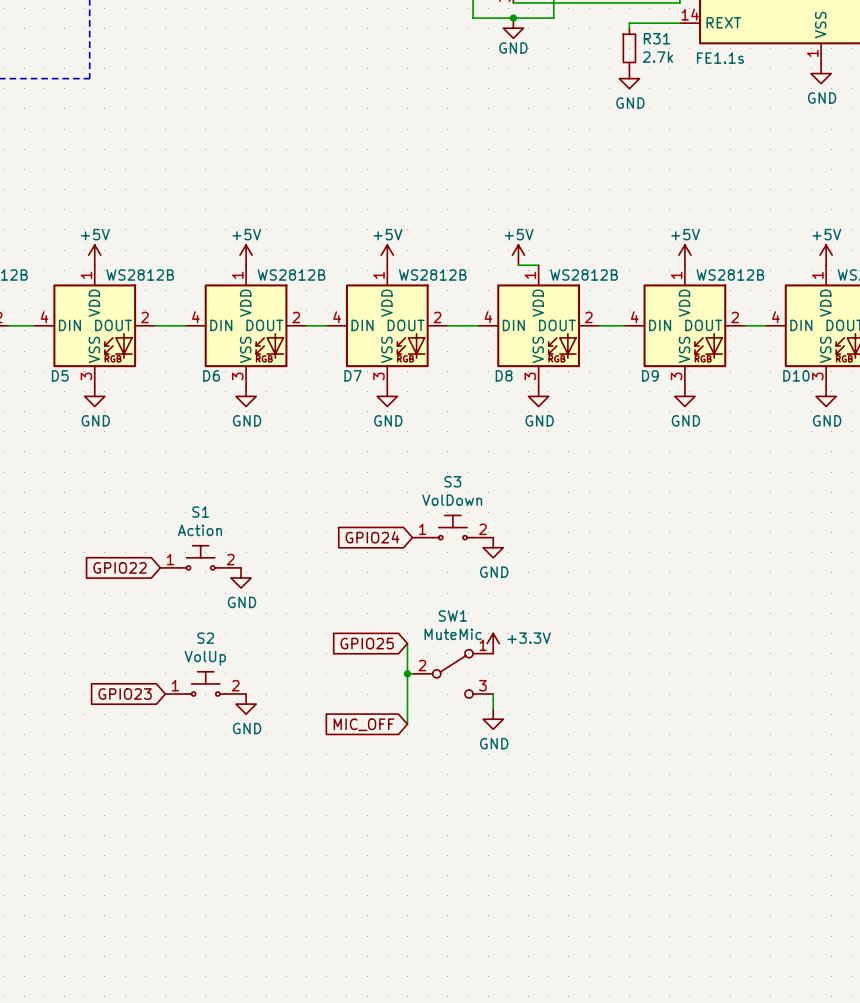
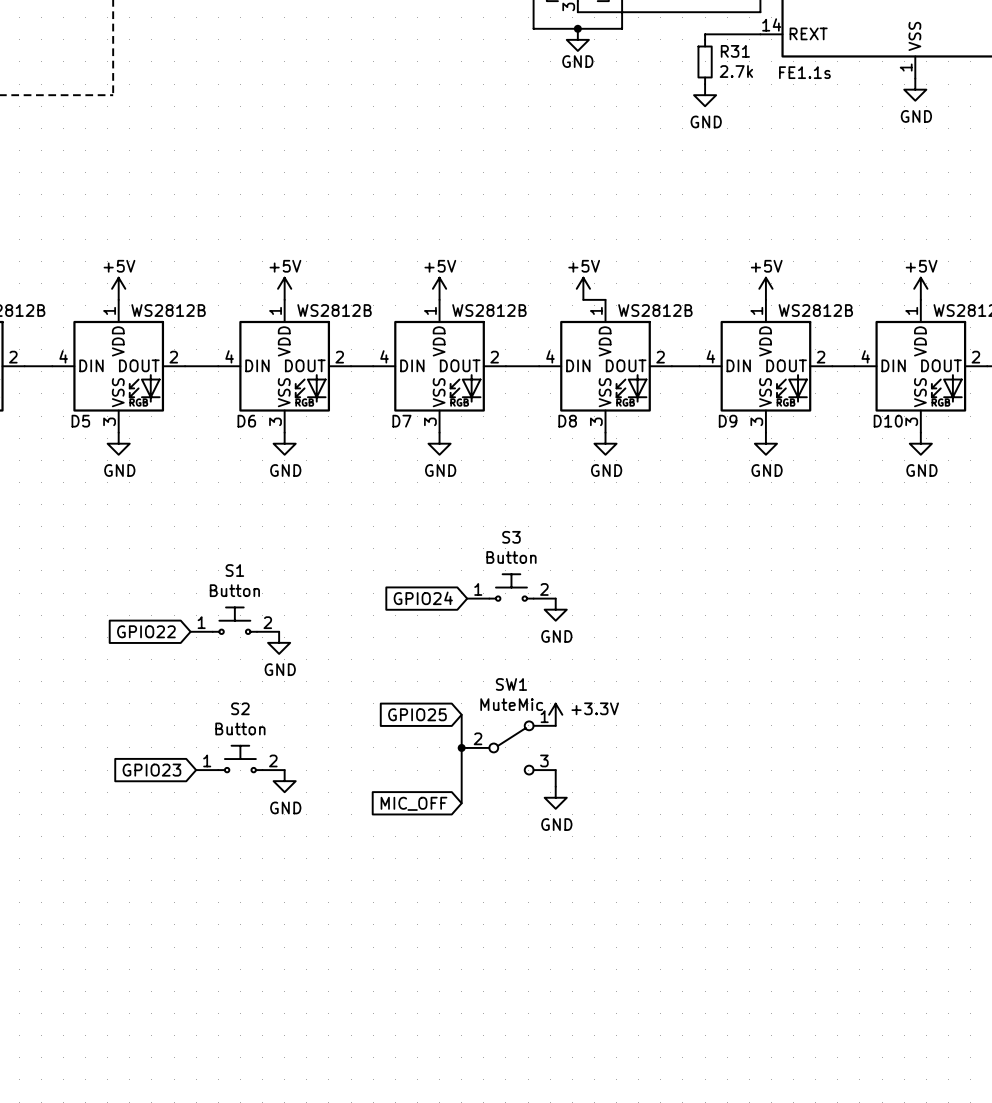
S3 value: VolDown (452, 500) -> Button (511, 557)
S1 value: Action (199, 530) -> Button (234, 590)
S2 value: VolUp (205, 658) -> Button (240, 728)

